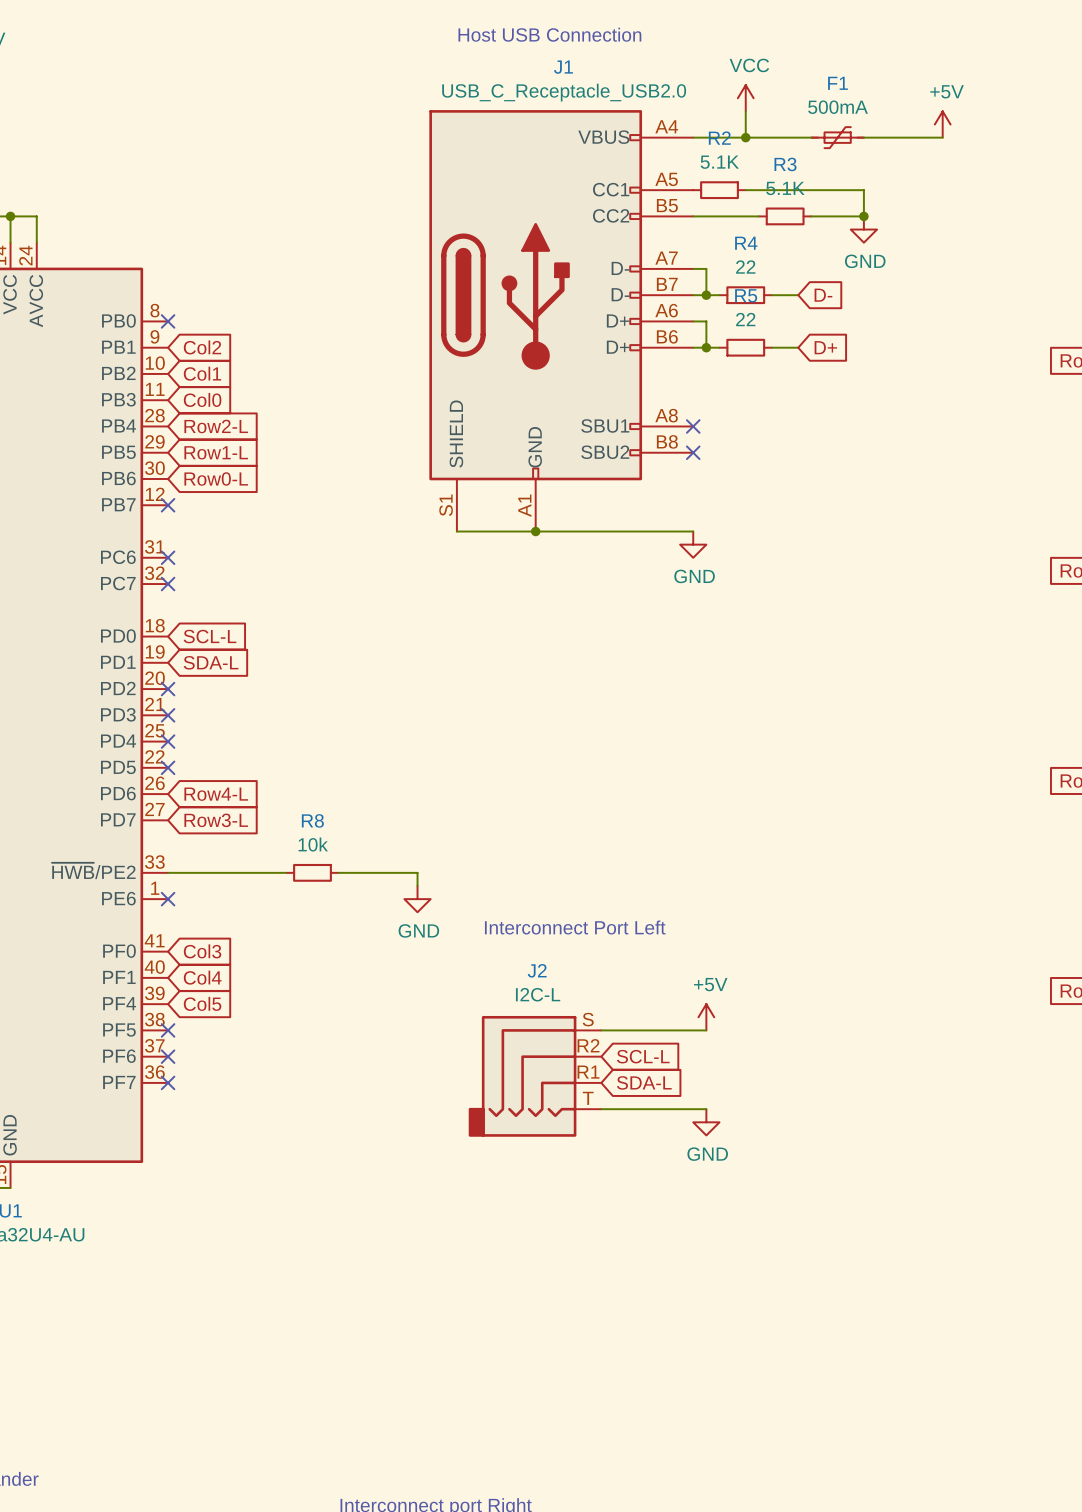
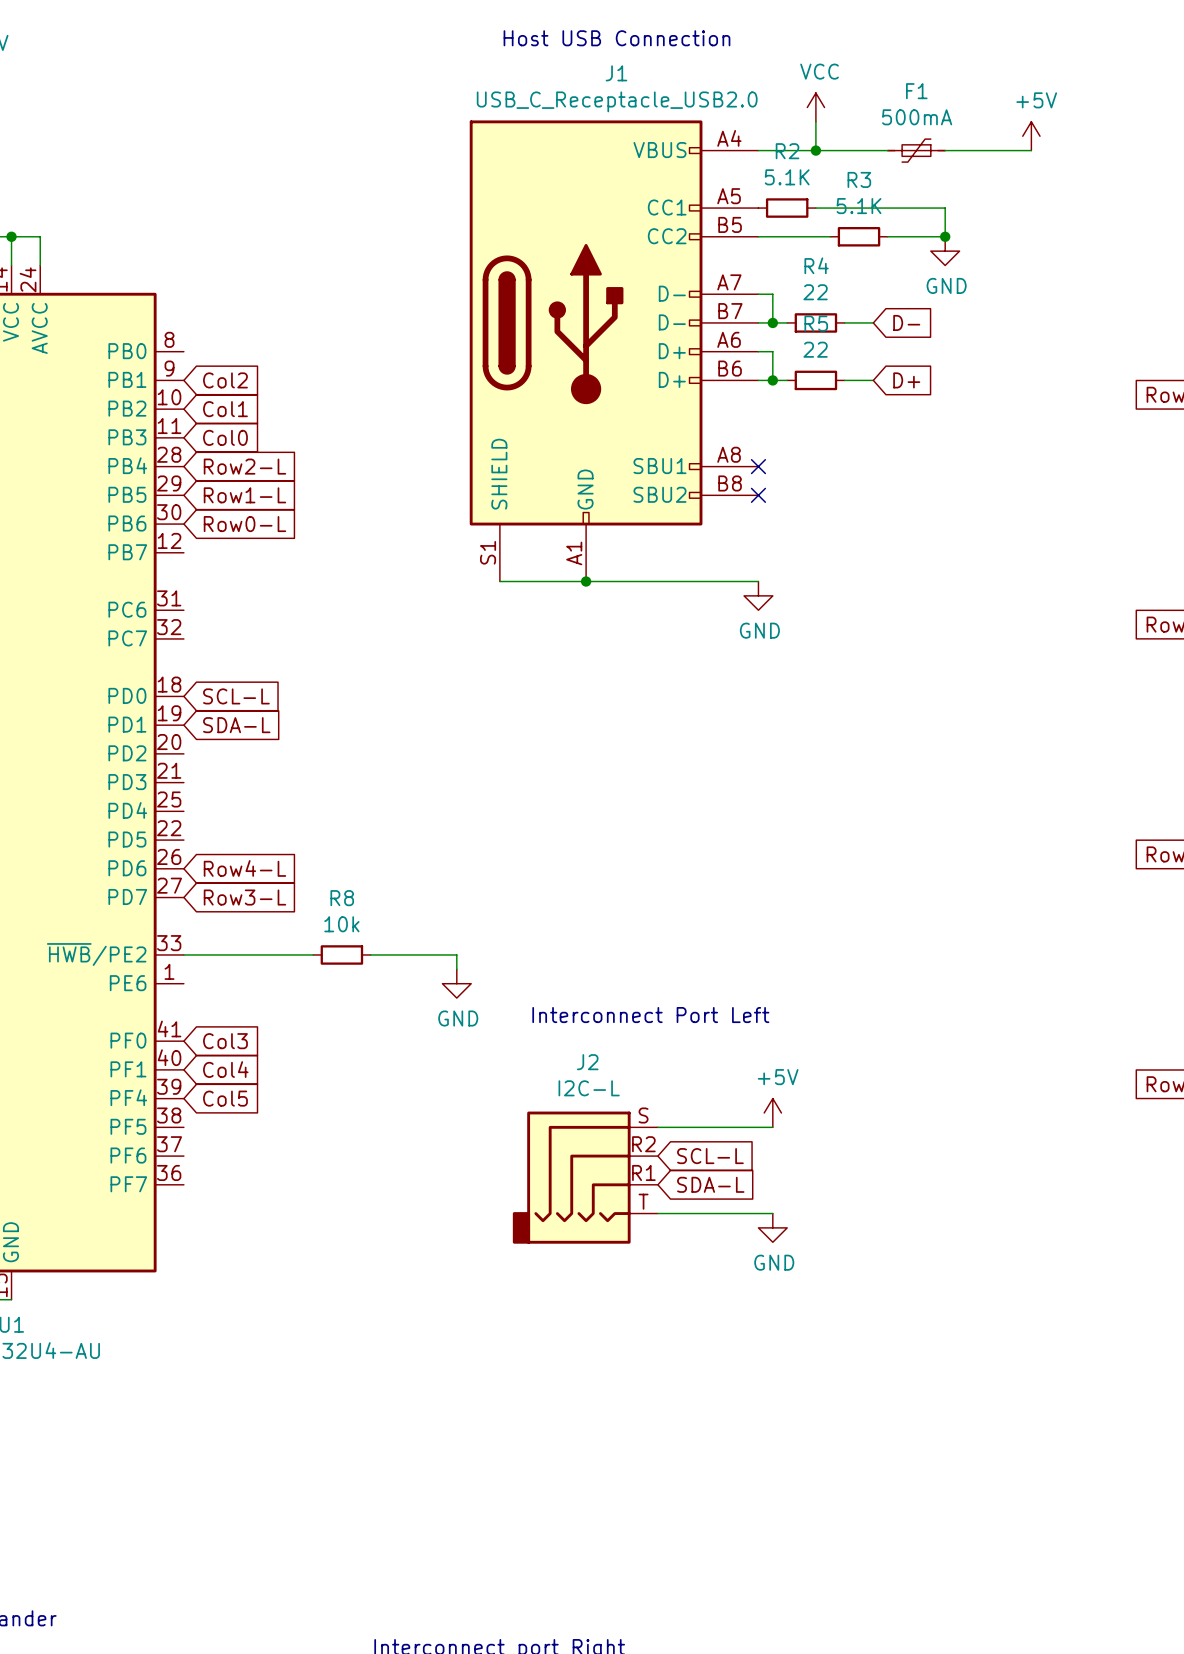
no-connect mark: (168, 321) -> none
no-connect mark: (168, 505) -> none
no-connect mark: (168, 557) -> none
no-connect mark: (168, 584) -> none
no-connect mark: (168, 689) -> none
no-connect mark: (168, 715) -> none
no-connect mark: (168, 741) -> none
no-connect mark: (168, 767) -> none
no-connect mark: (168, 899) -> none
no-connect mark: (168, 1030) -> none
no-connect mark: (168, 1056) -> none
no-connect mark: (168, 1082) -> none

